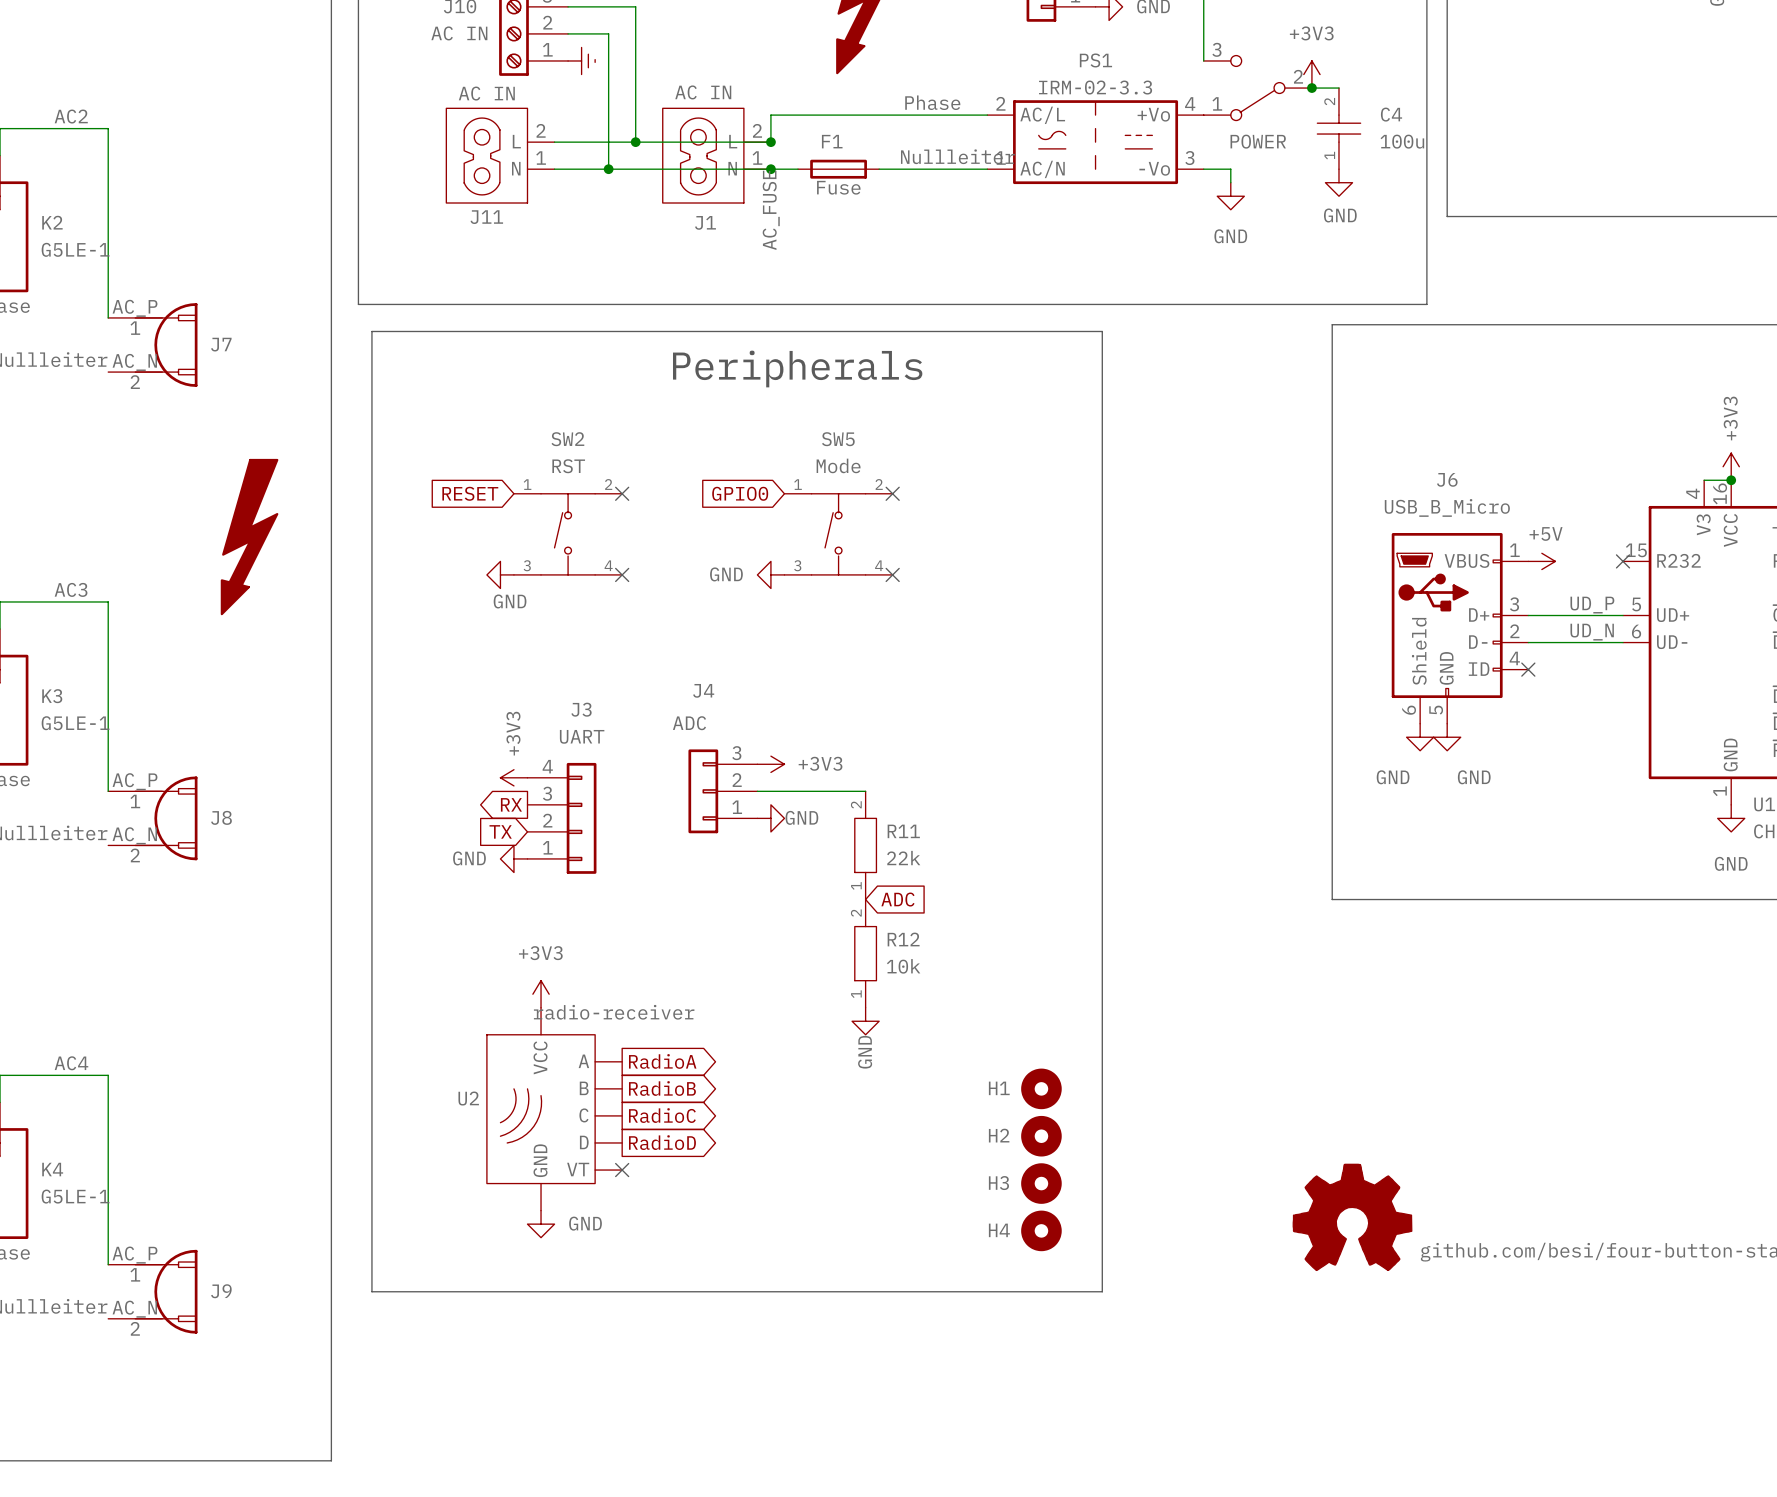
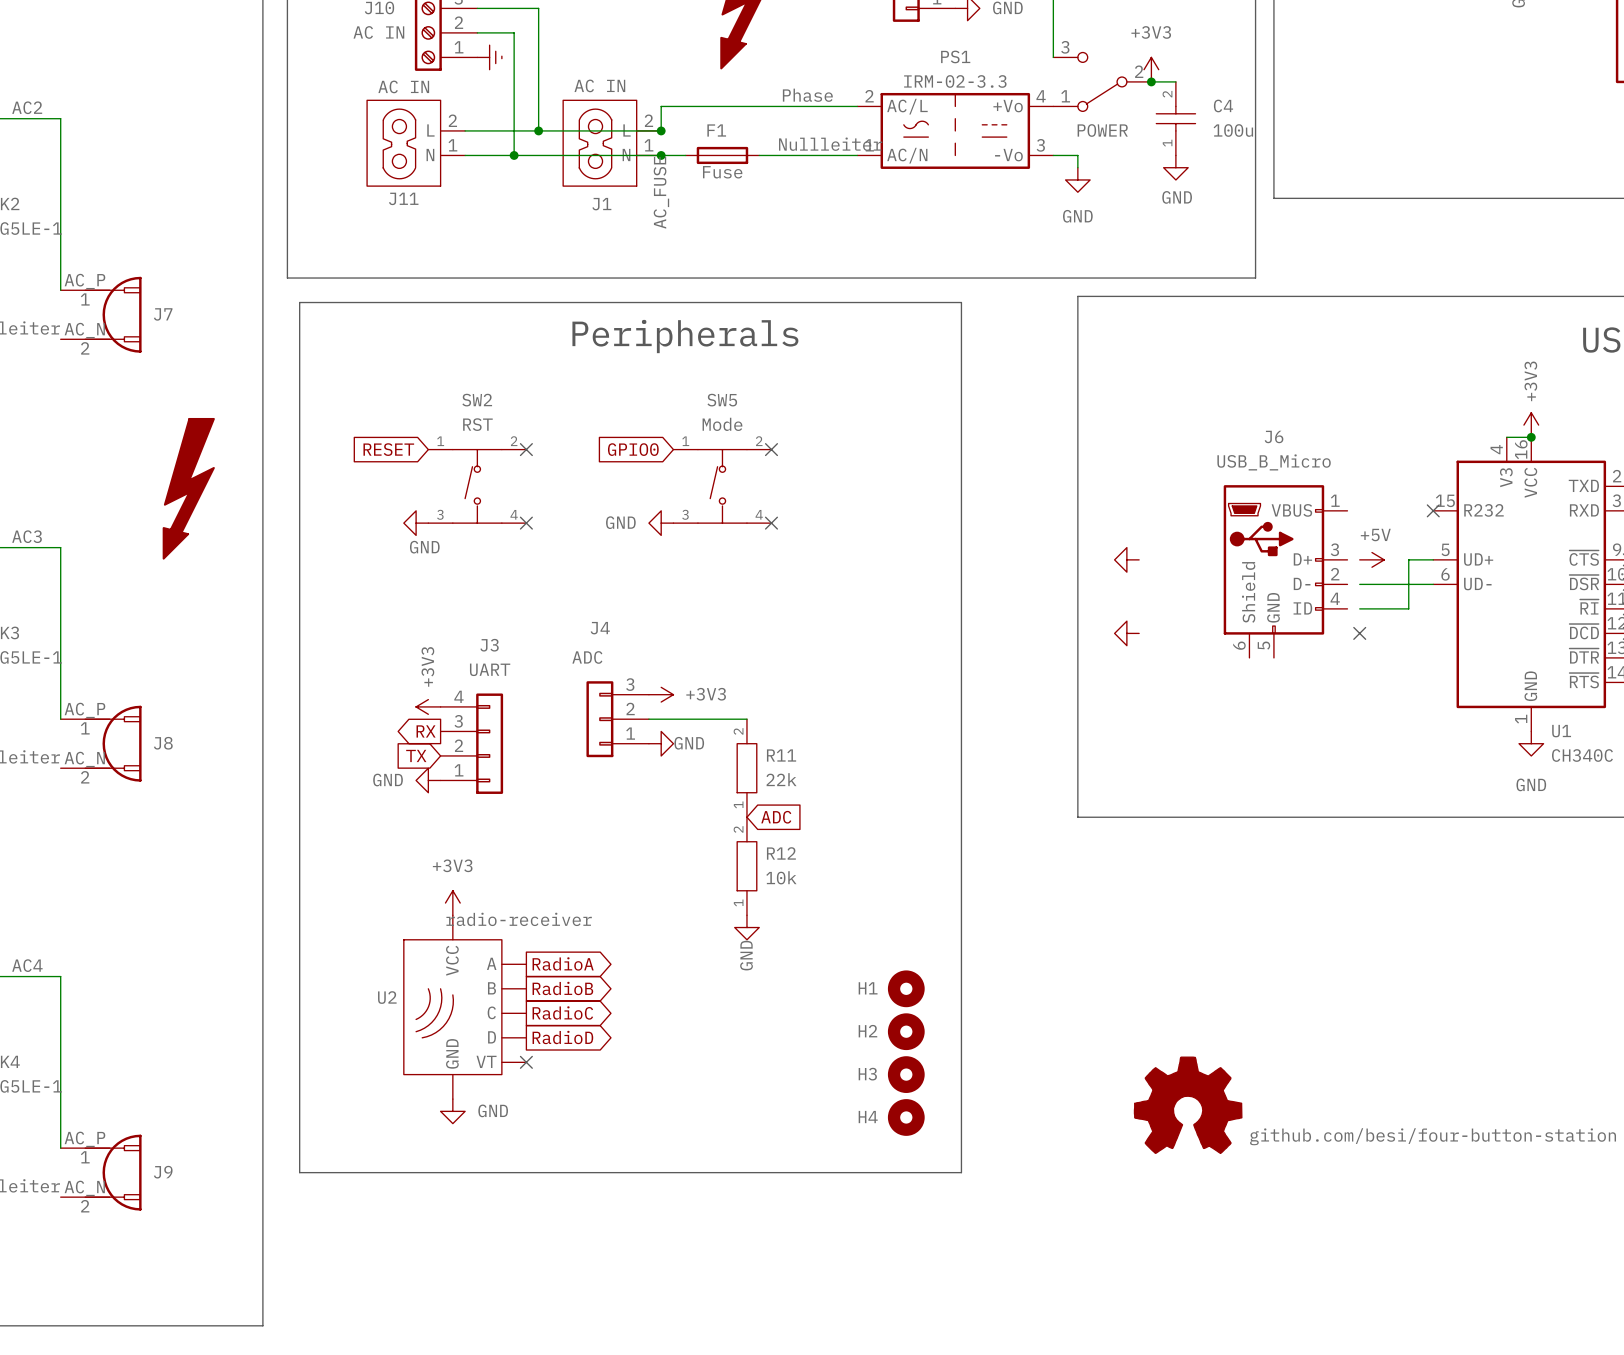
line: (1332, 324) (1332, 899) -> (1169, 296) (1077, 296) (1077, 817) (1169, 817)
power symbol position: +5V (1541, 561) -> +5V (1371, 559)
label: UD_P (1592, 605) -> none
power symbol: none -> (1126, 559)
wire: (1528, 615) (1595, 615) -> (1359, 608) (1408, 608) (1408, 559)
label: UD_N (1592, 632) -> none
wire: (1528, 642) (1541, 642) -> none
no-connect mark position: (1528, 669) -> (1359, 633)
power symbol: none -> (1126, 633)
power symbol: GND (1420, 737) -> none
power symbol: GND (1447, 737) -> none

